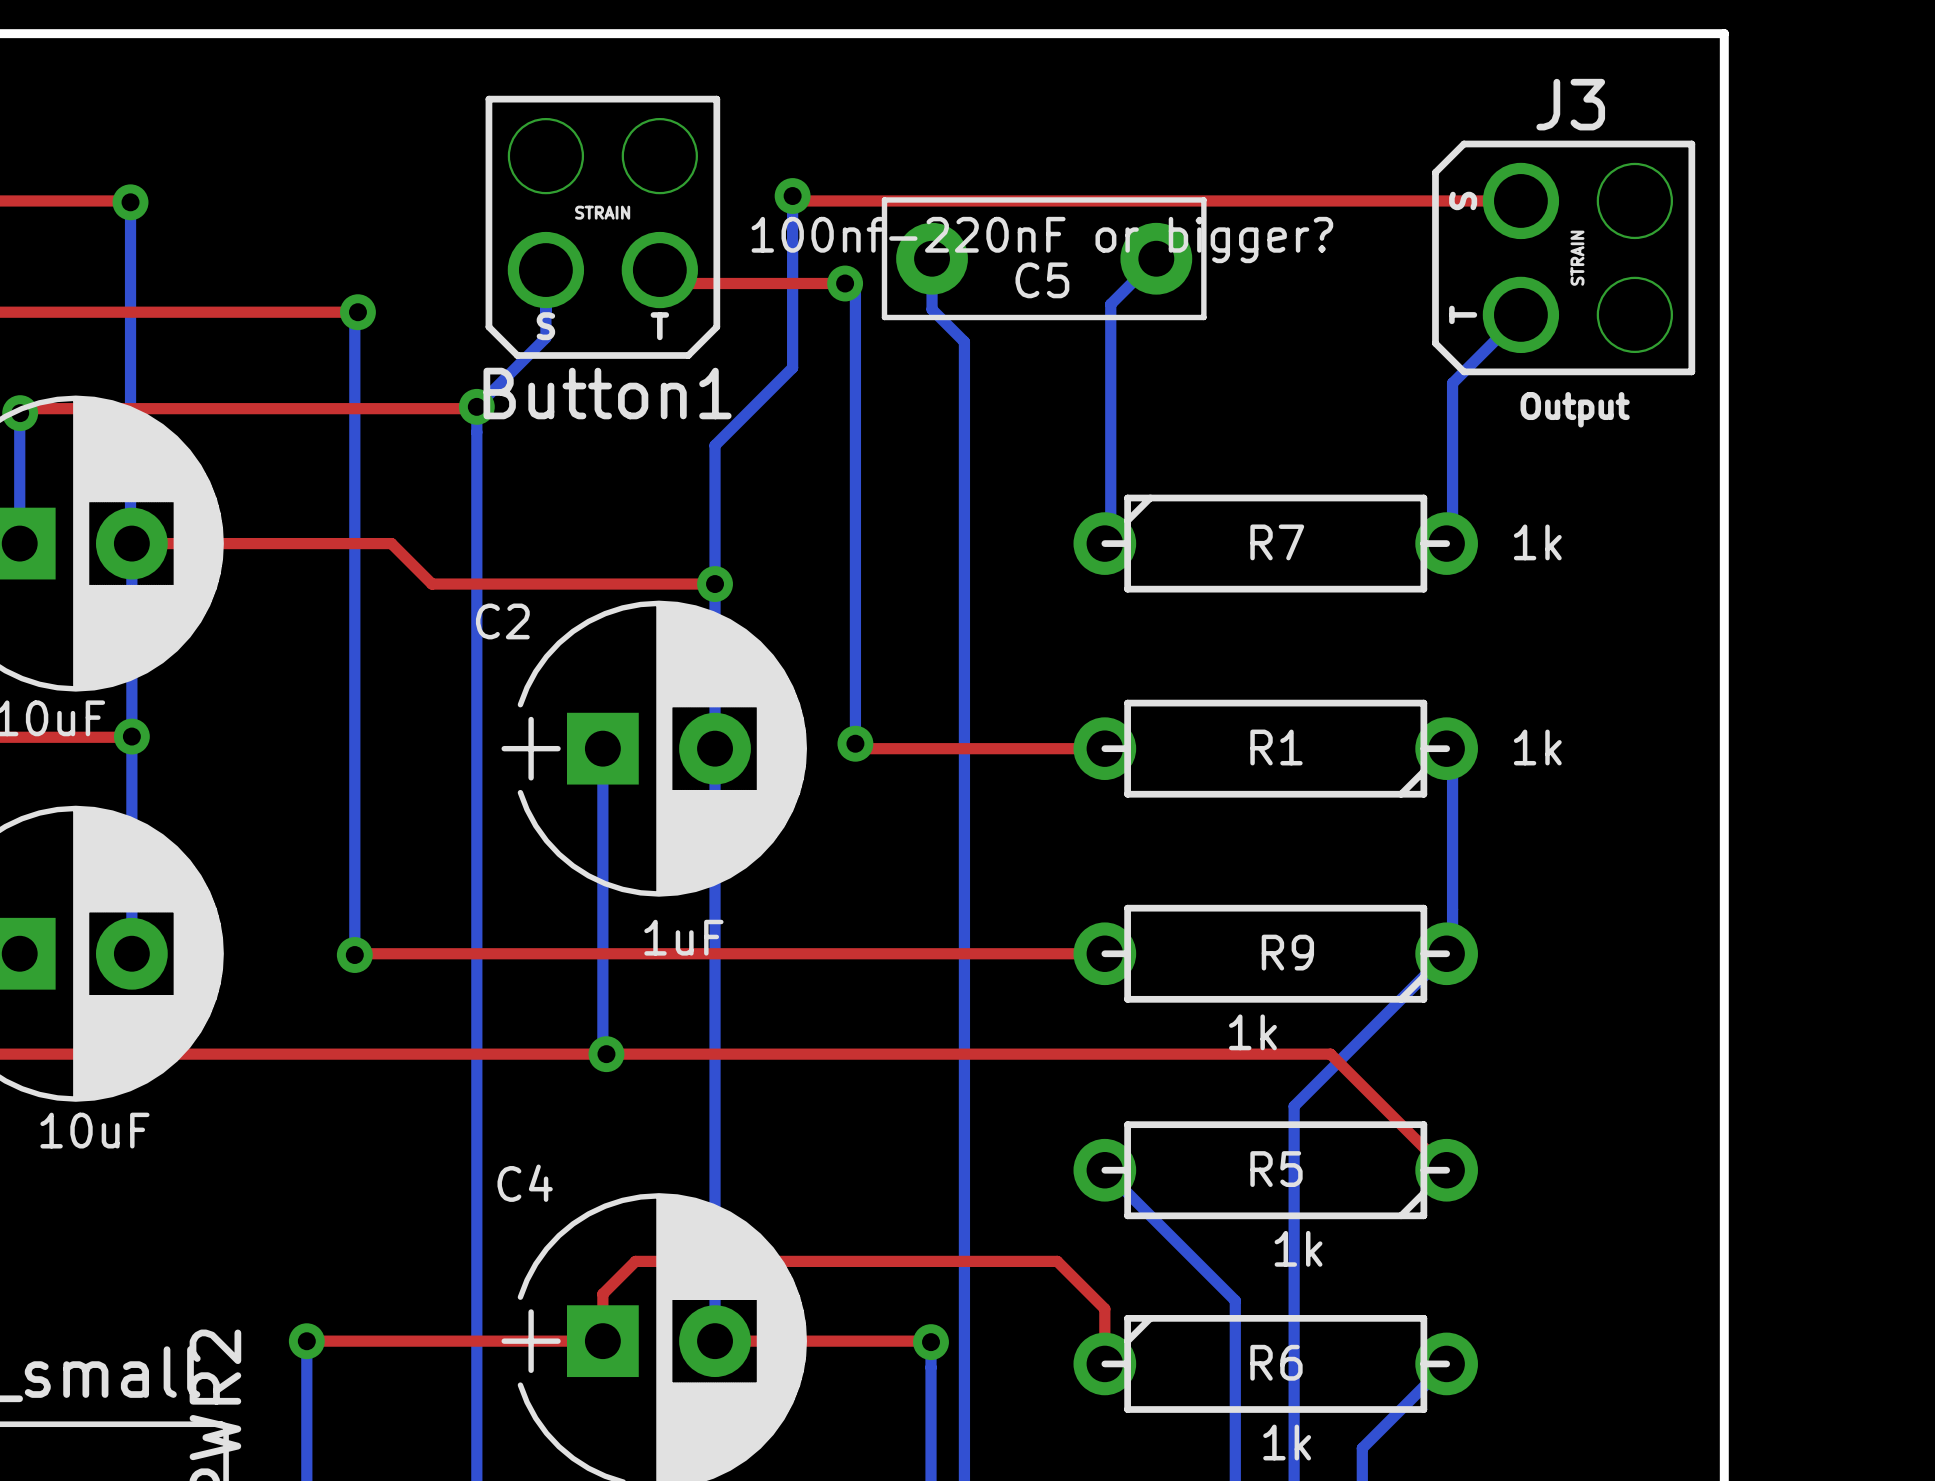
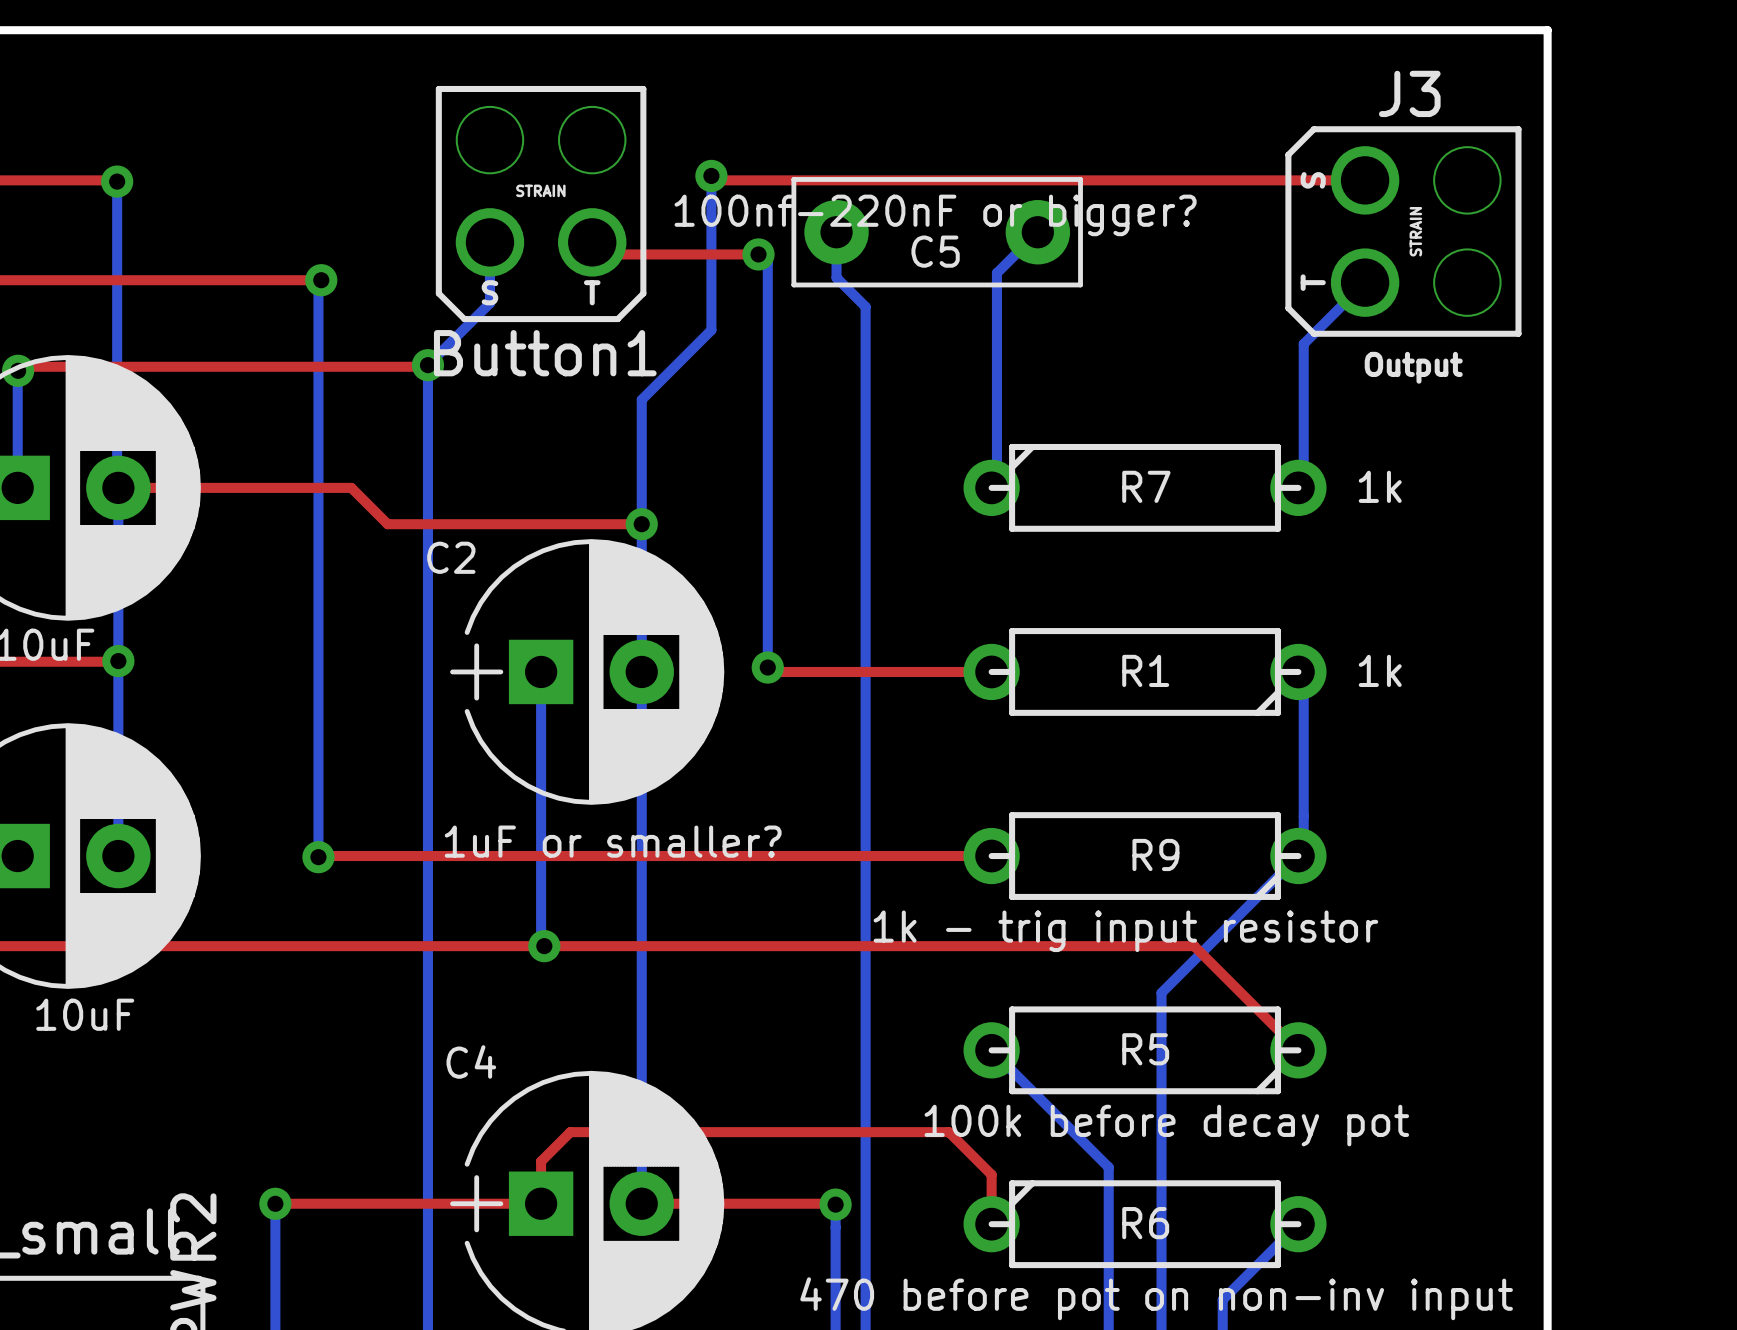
C2 value: 1uF (683, 937) -> 1uF or smaller? (613, 841)
R9 value: 1k (1252, 1032) -> 1k - trig input resistor (1125, 931)
R5 value: 1k (1298, 1248) -> 100k before decay pot (1166, 1125)
R6 value: 1k (1287, 1442) -> 470 before pot on non-inv input (1156, 1298)

